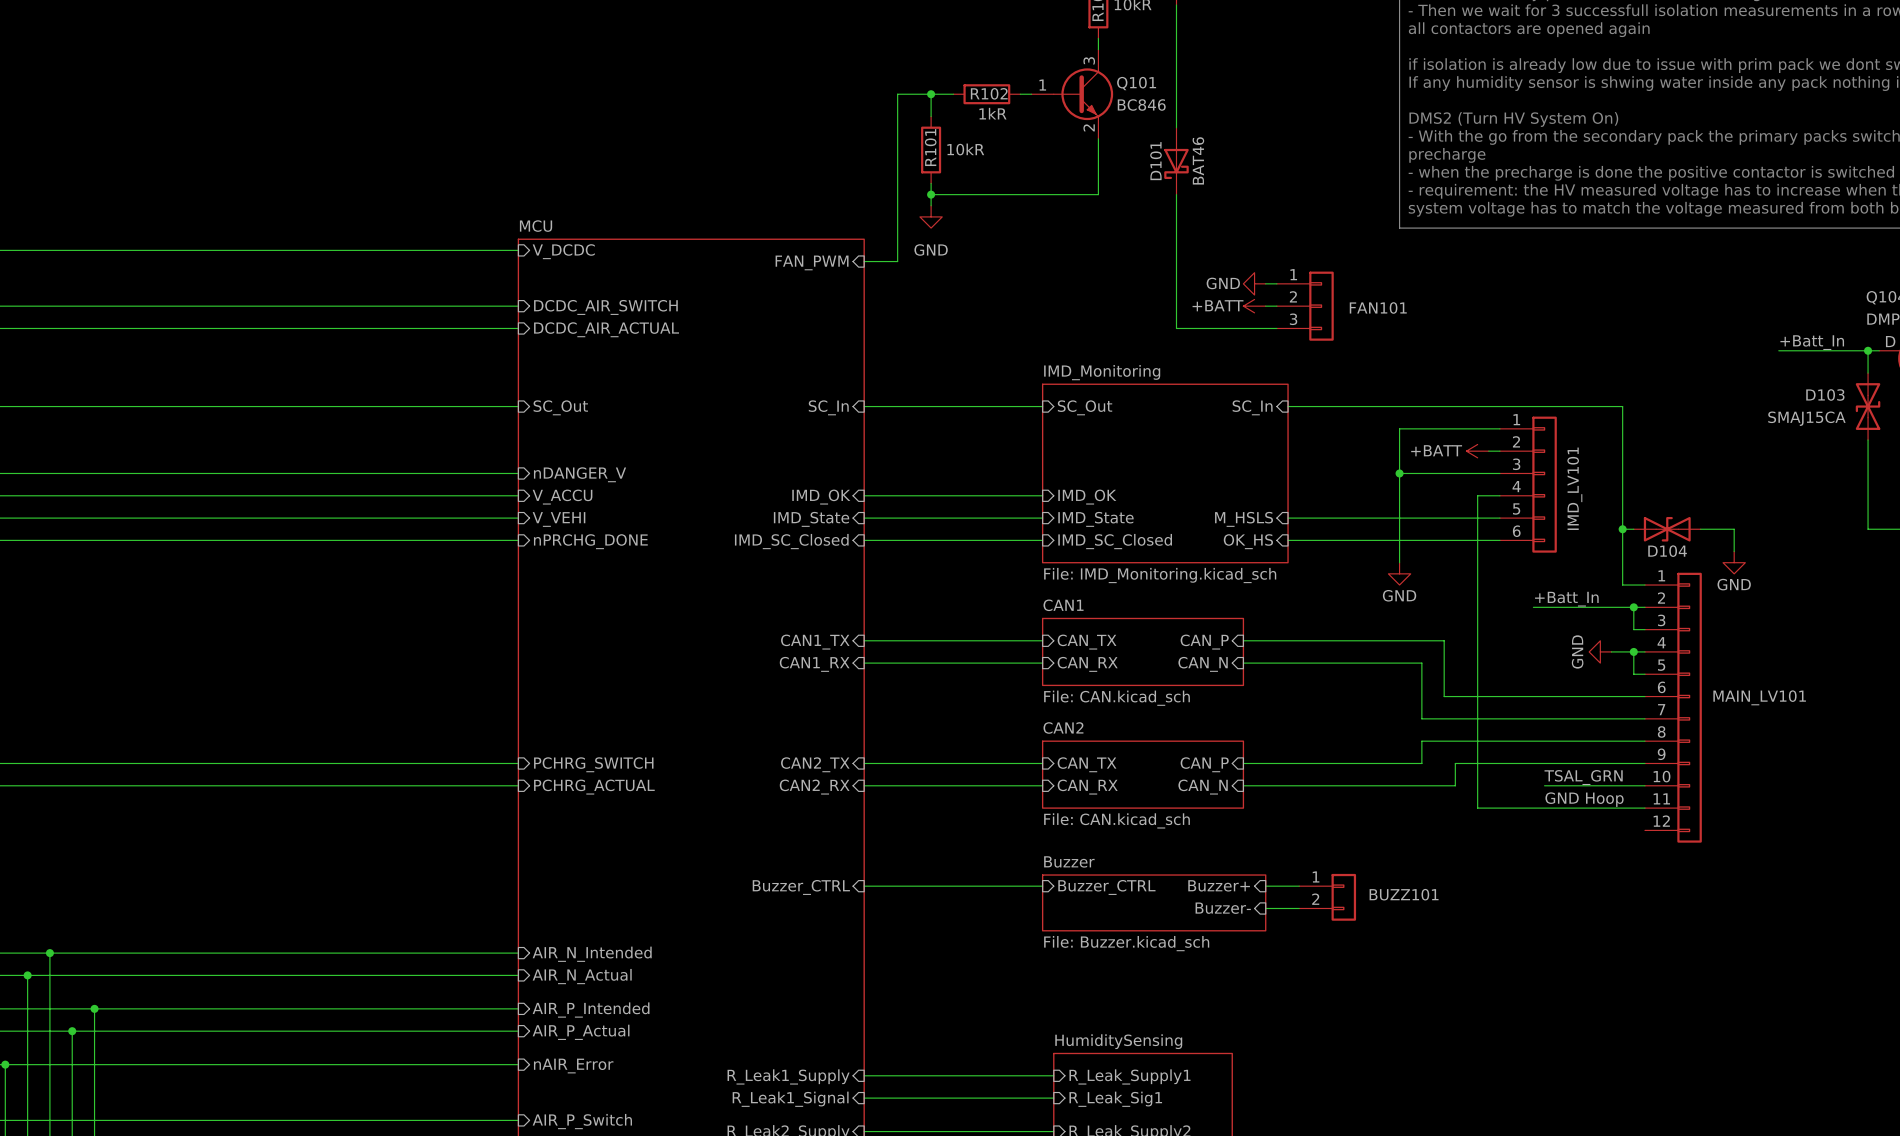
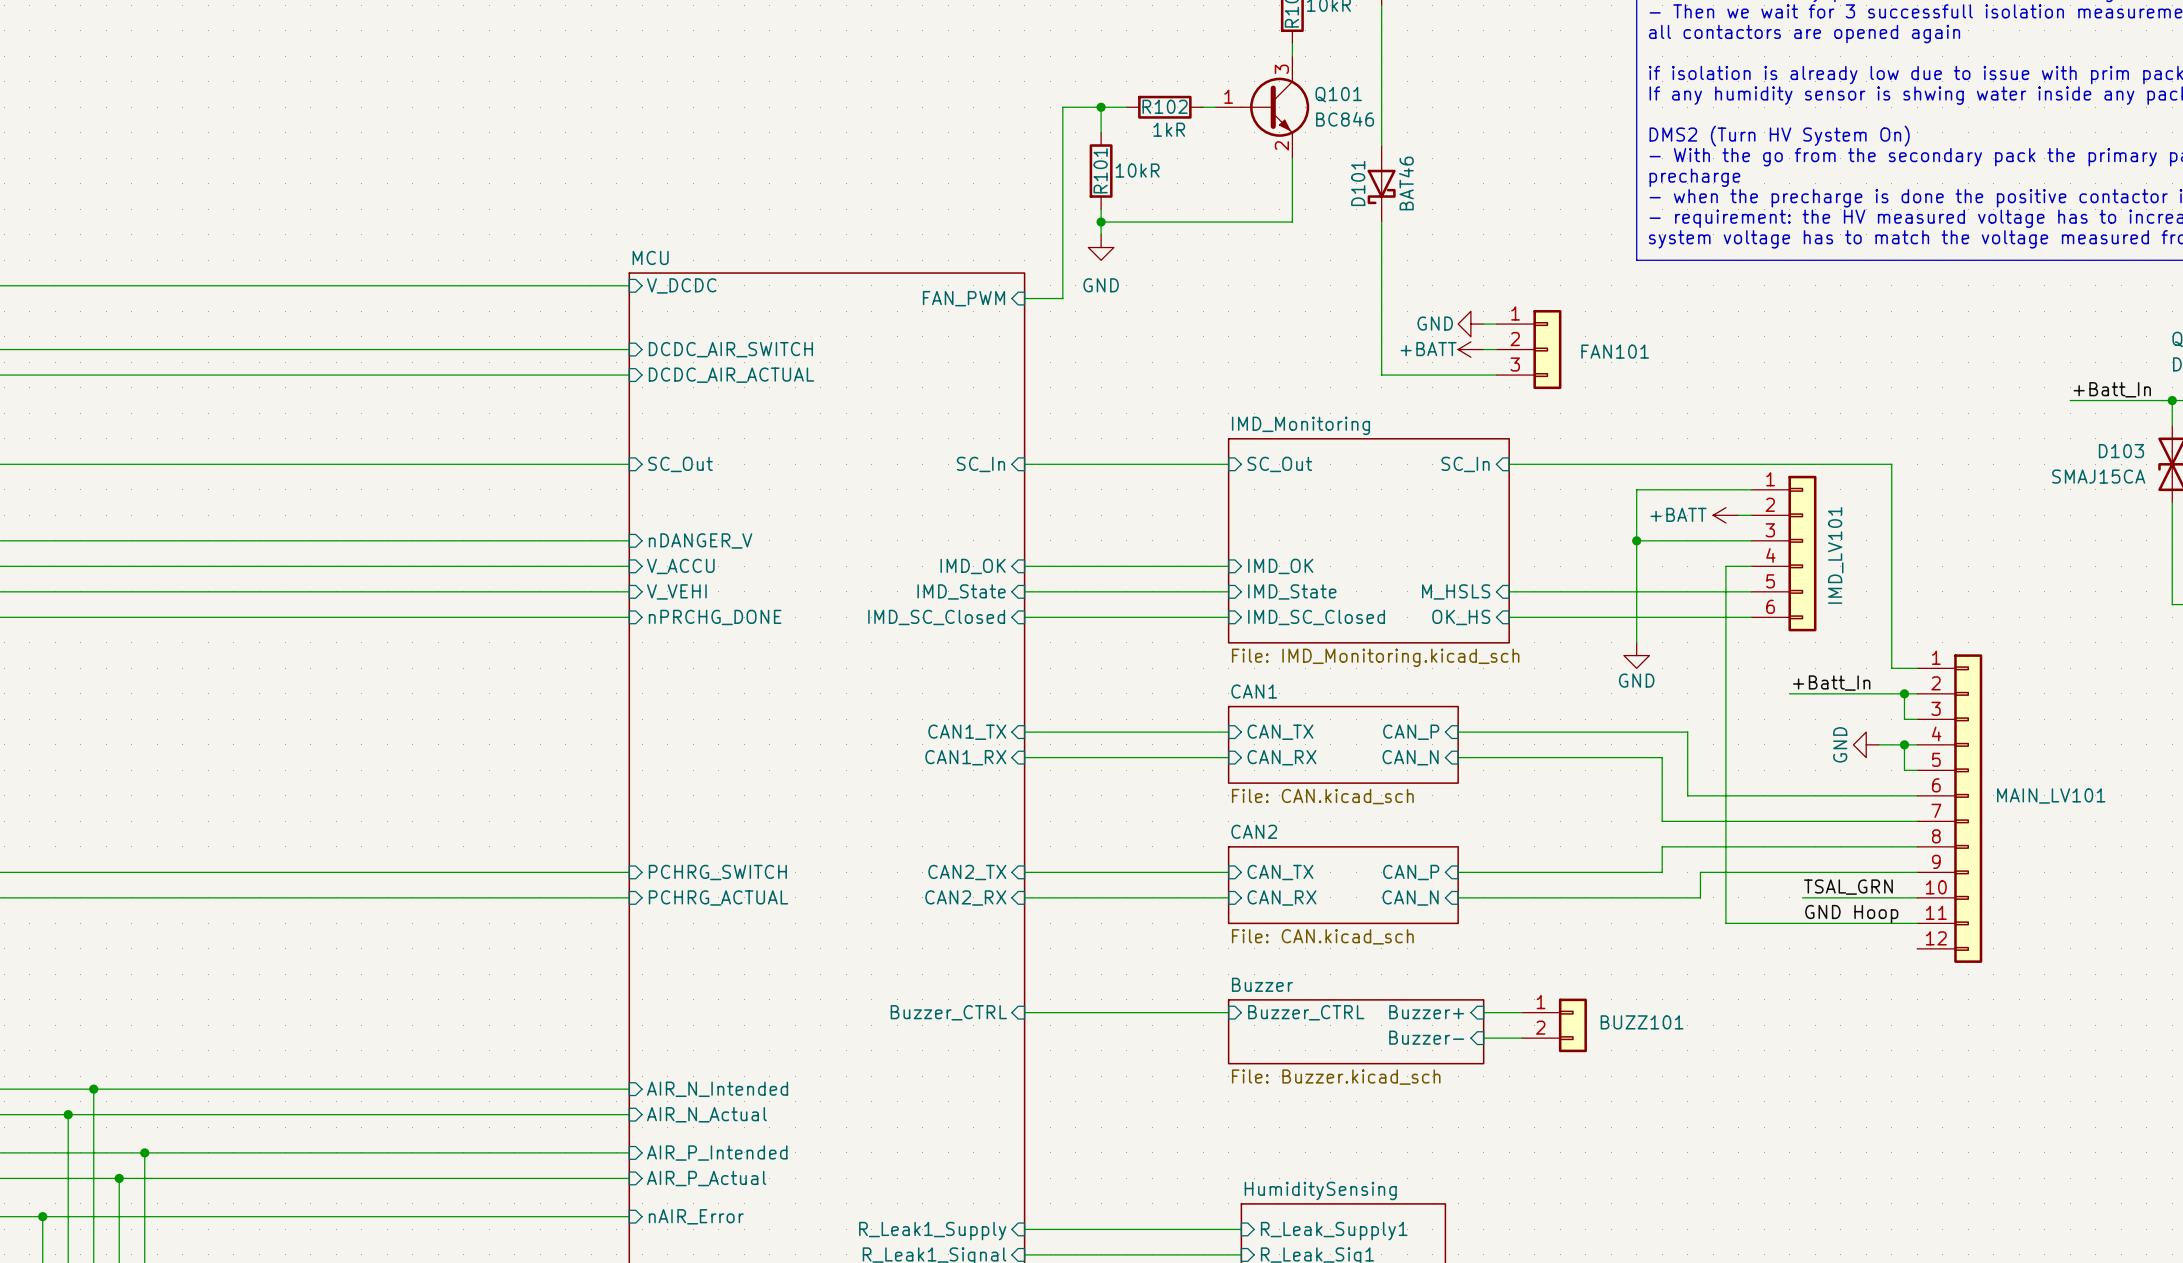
wire: (1622, 529) (1633, 529) -> none
junction: (1622, 529) -> none
D104: (1667, 529) -> none
wire: (1700, 529) (1734, 529) (1734, 551) -> none
power symbol: GND (1734, 562) -> none

